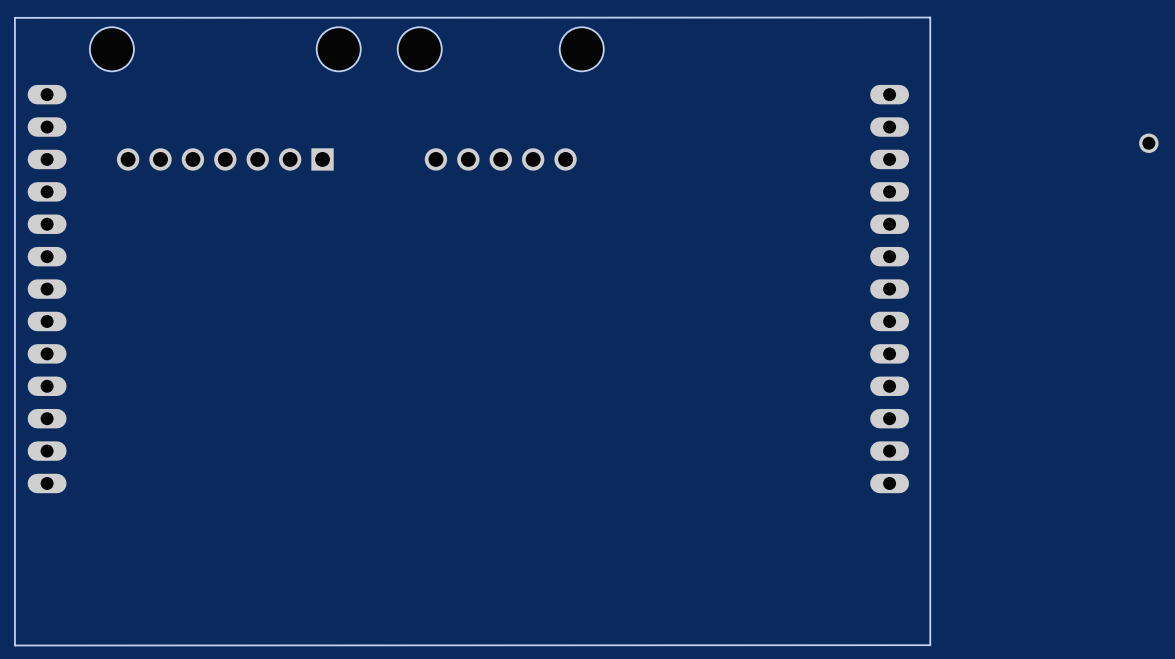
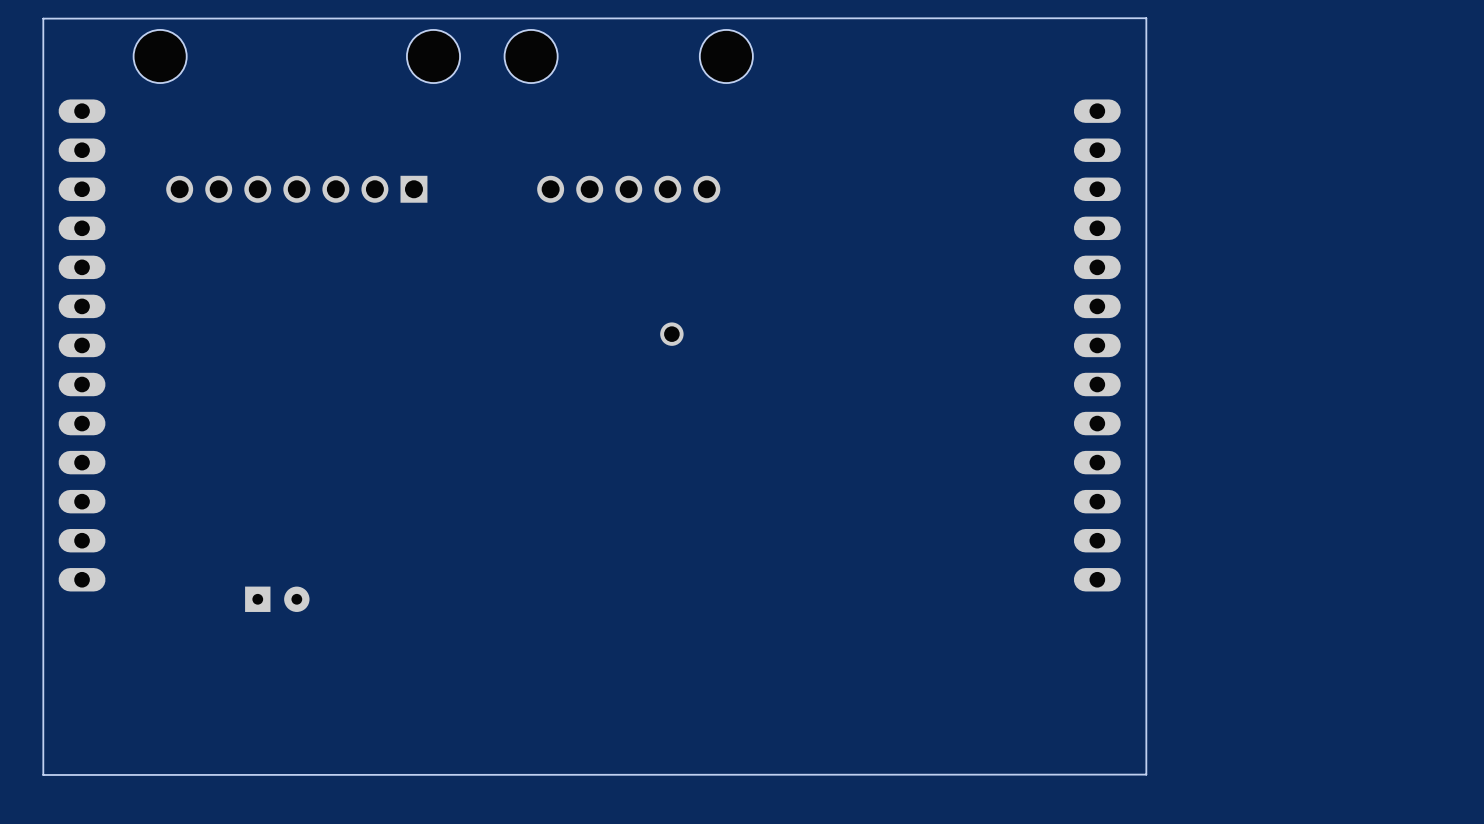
part: (1148, 143) -> none
part: none -> (671, 334)
part: none -> (277, 599)

